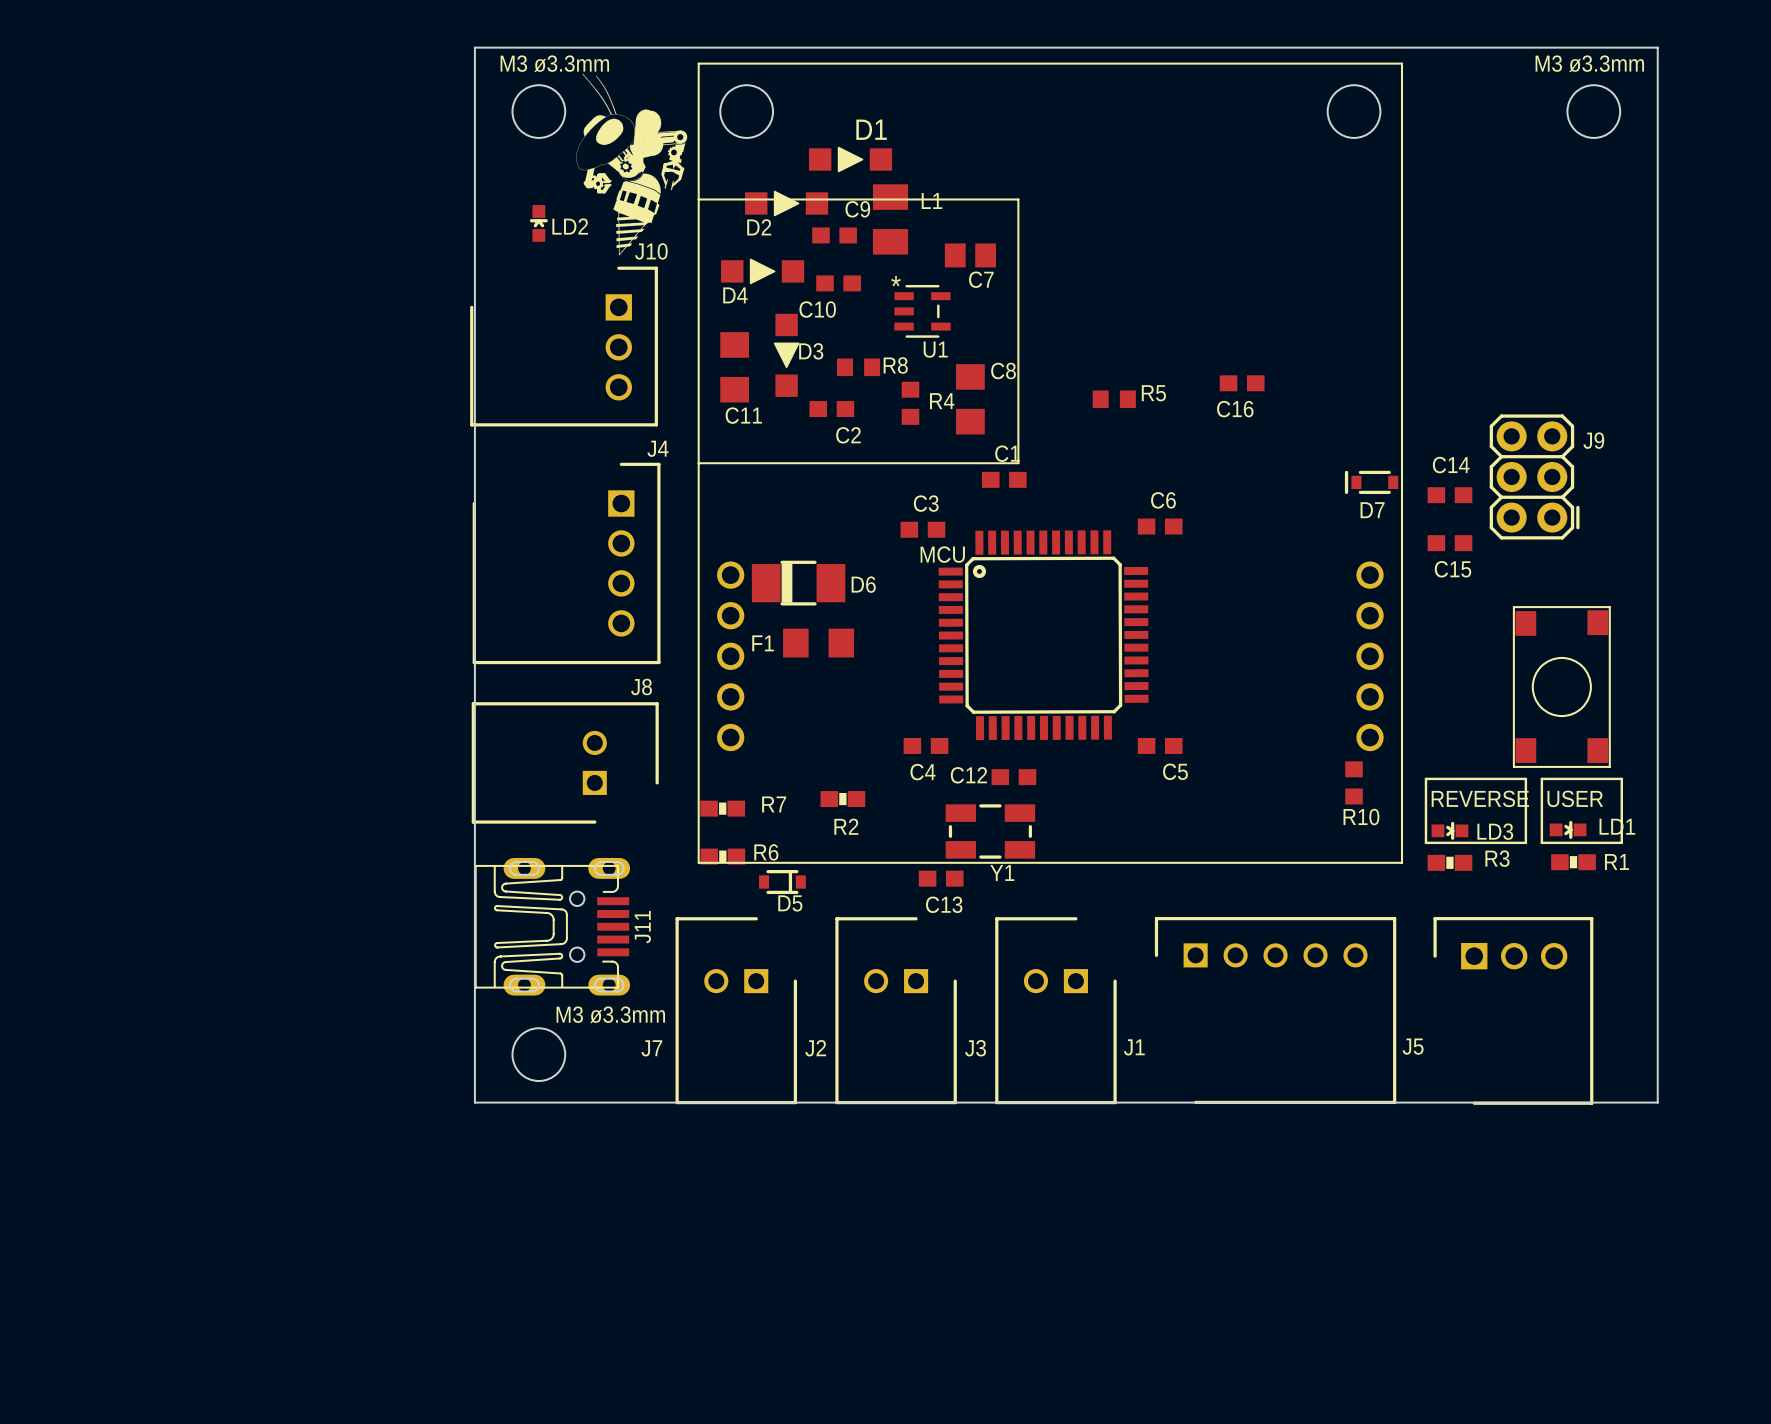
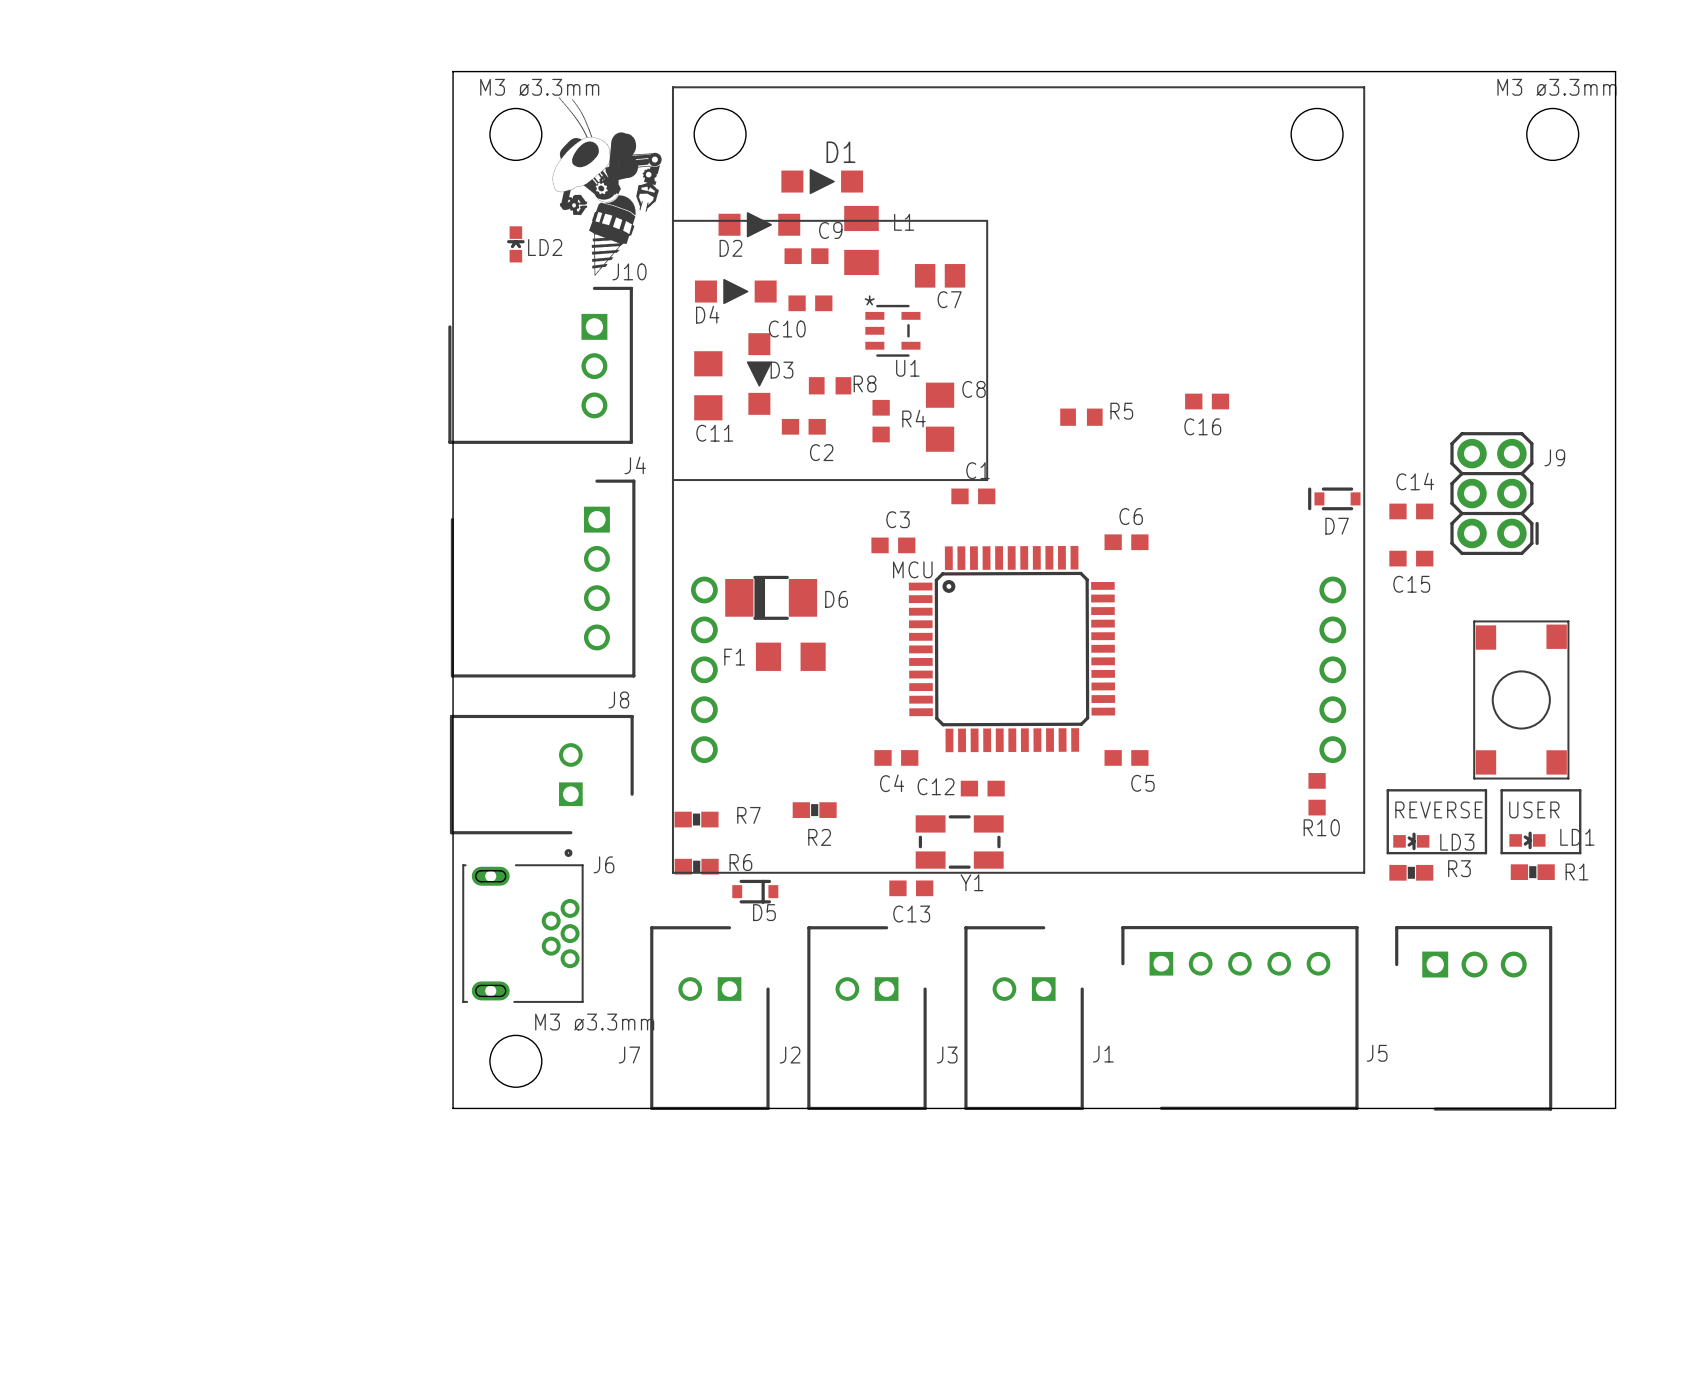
J6: none -> (522, 926)
J11: (552, 926) -> none

